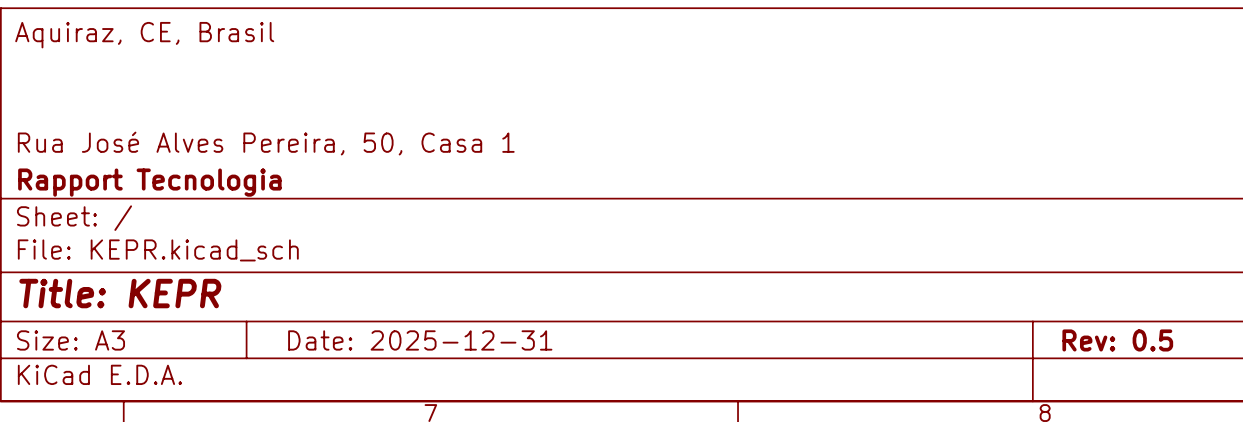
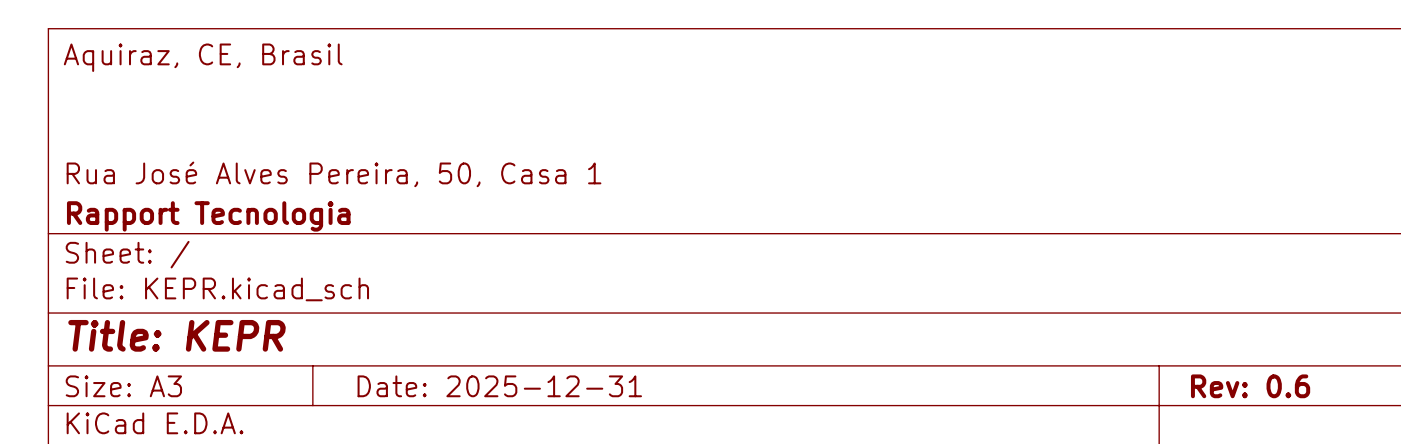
title block: Rev: 0.5 (1117, 340) -> Rev: 0.6 (1250, 386)

